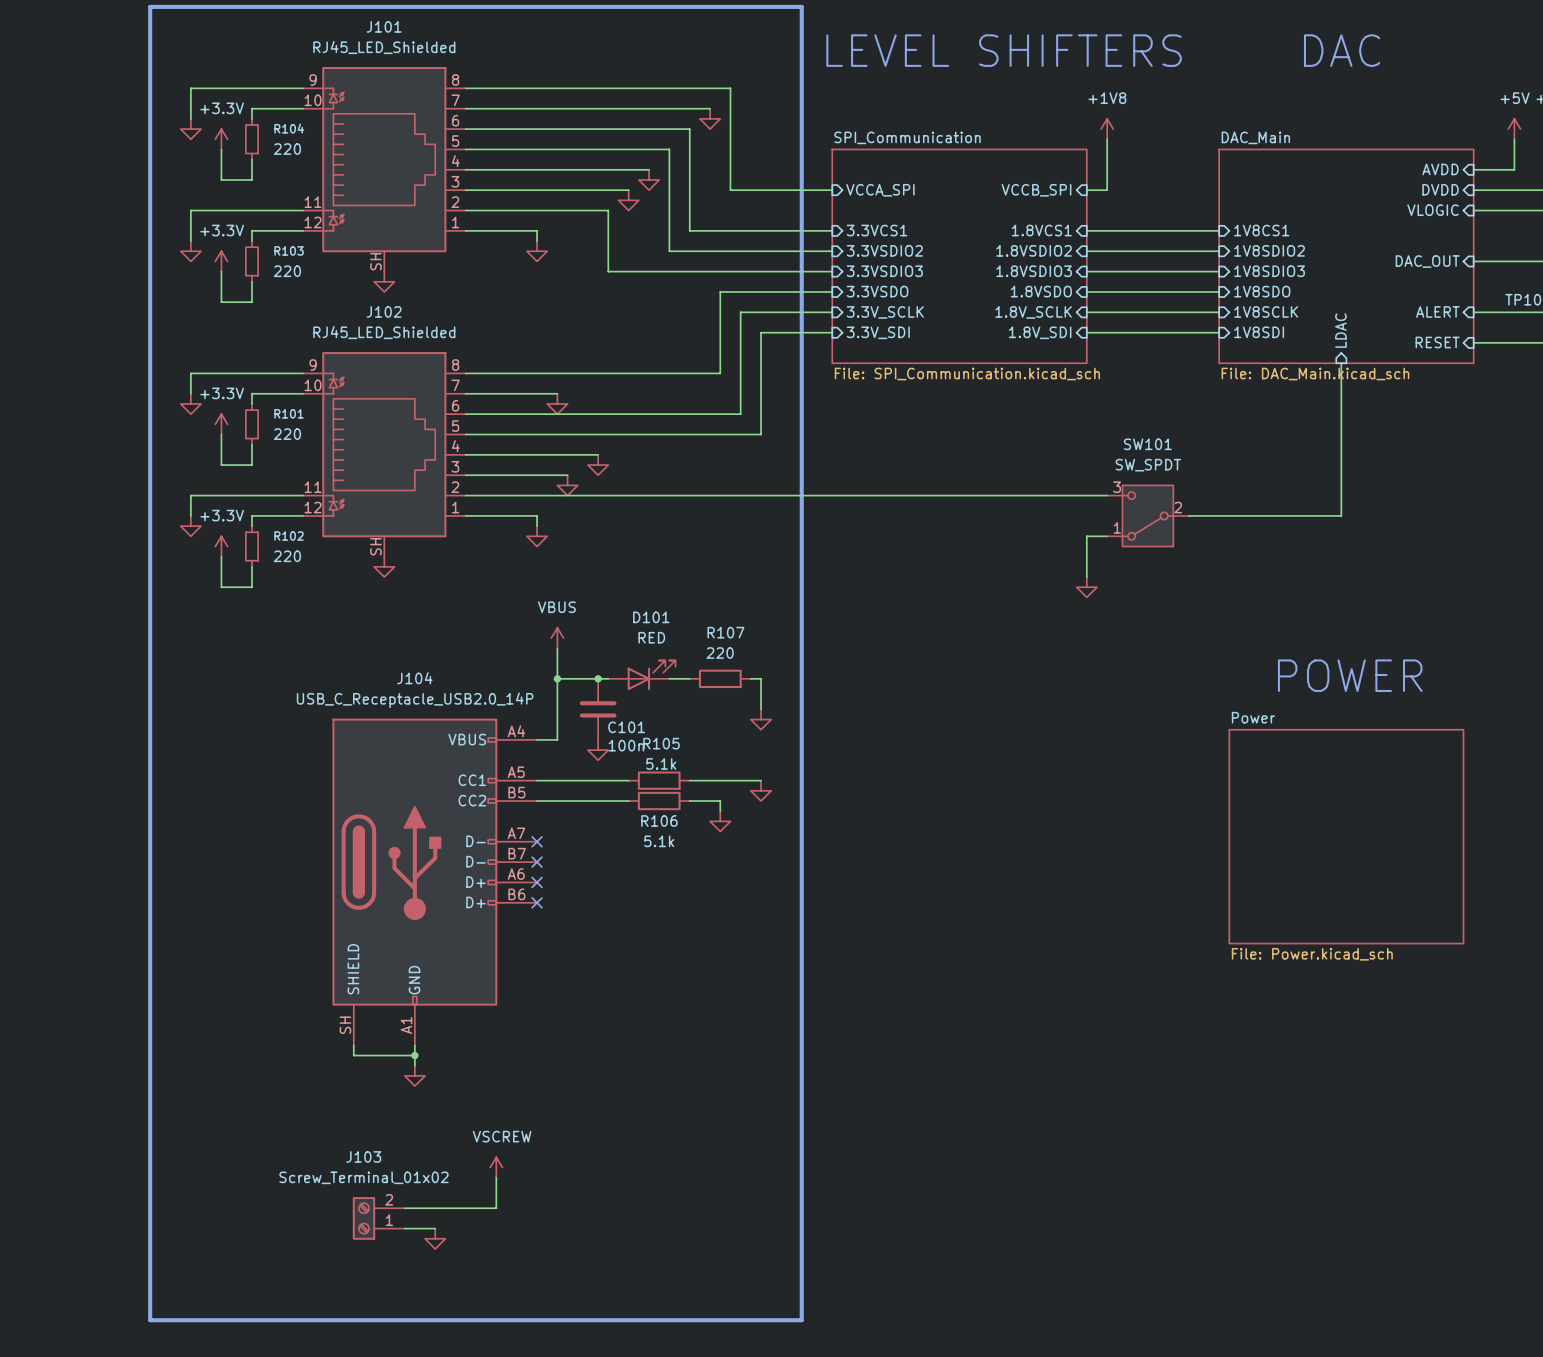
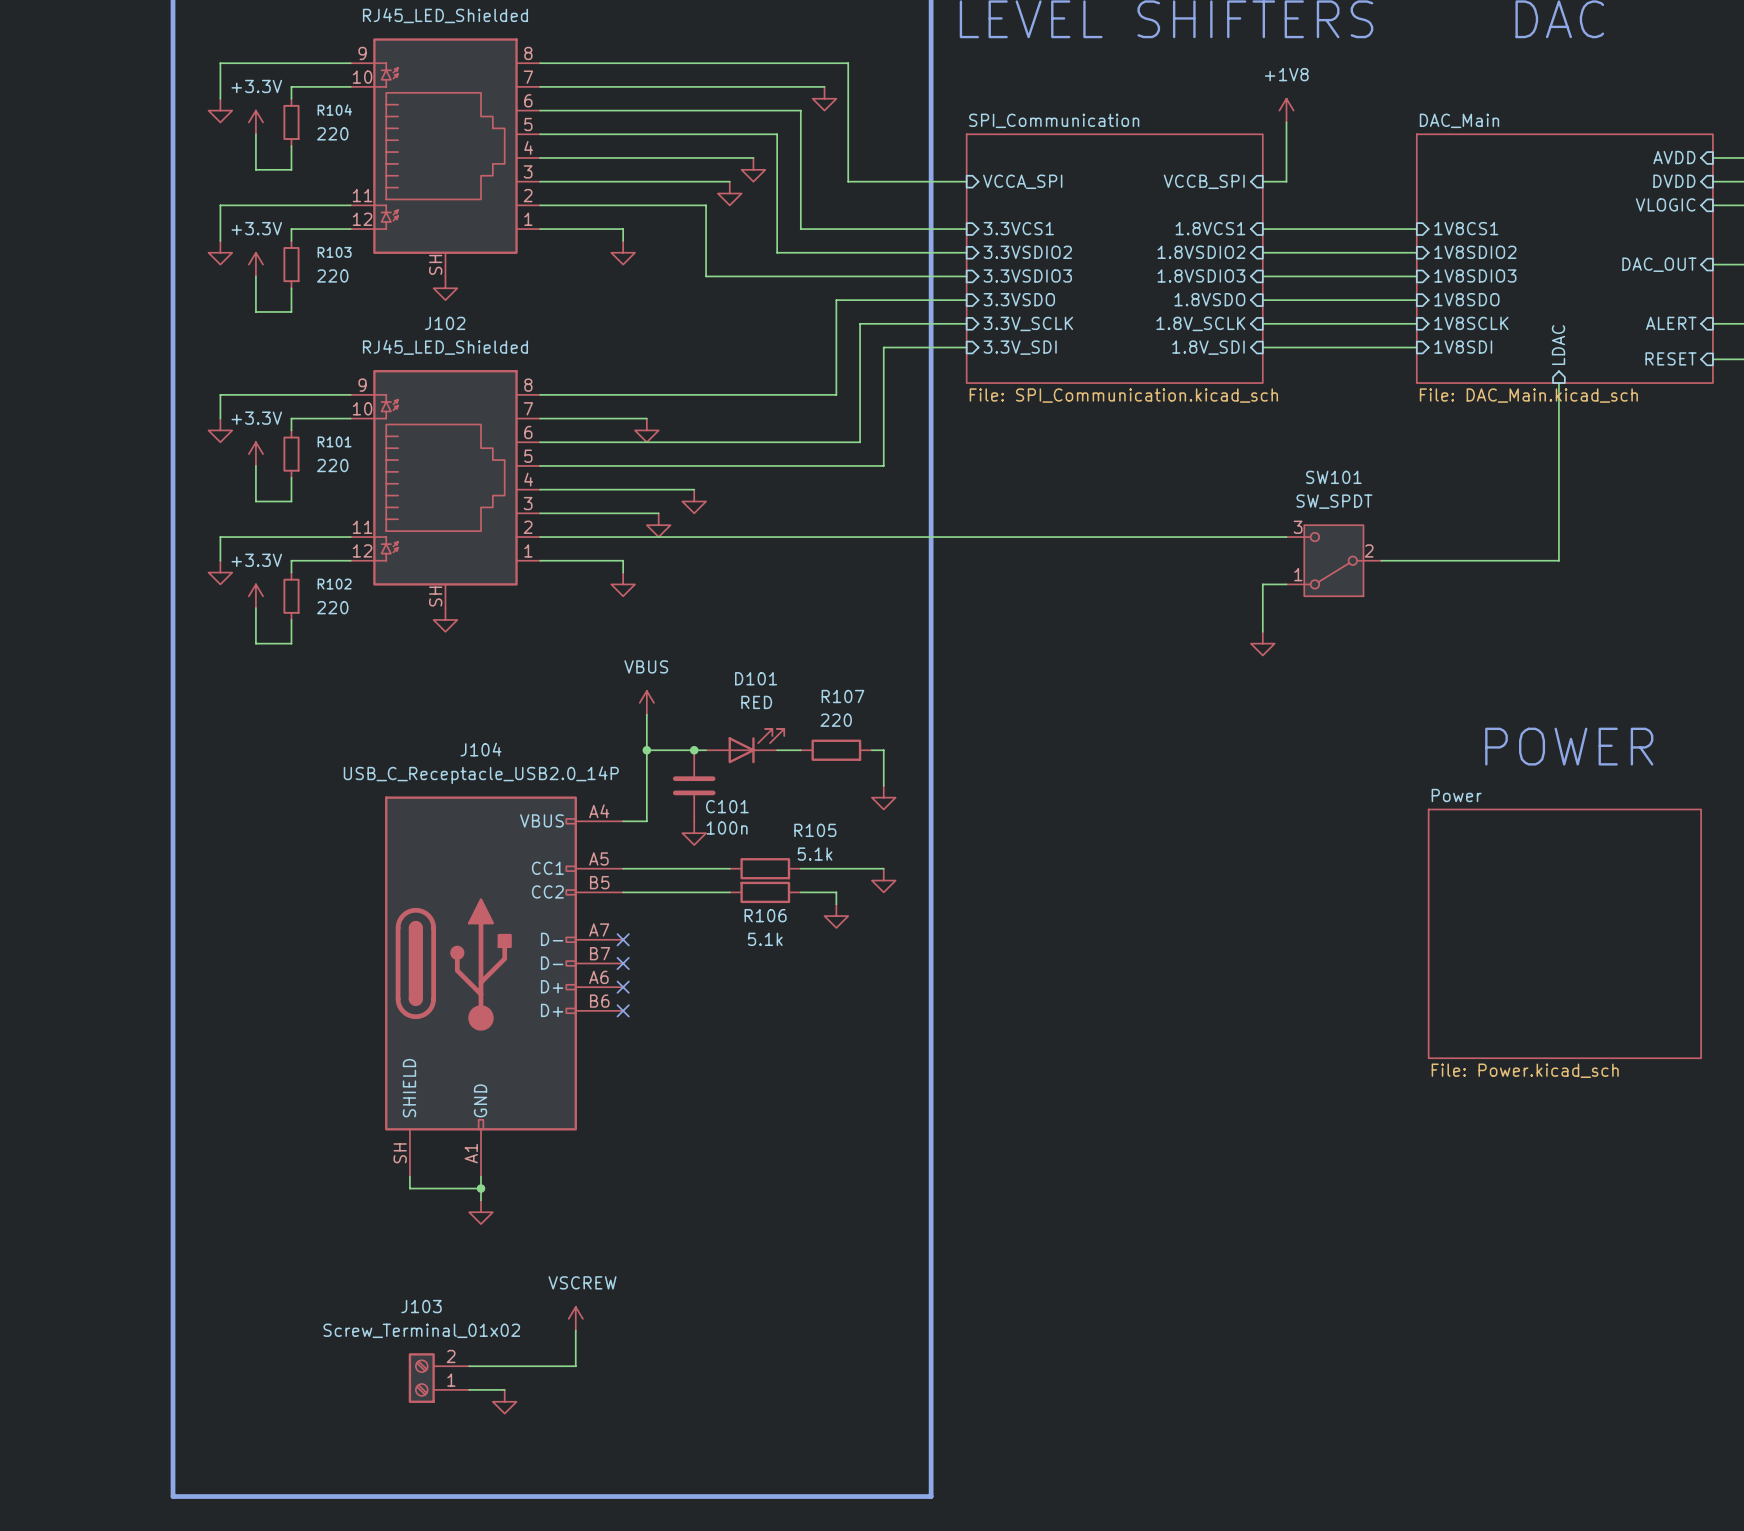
R105 name position: R105 (661, 743) -> R105 (815, 830)
R105 value position: 5.1k (661, 763) -> 5.1k (815, 854)

